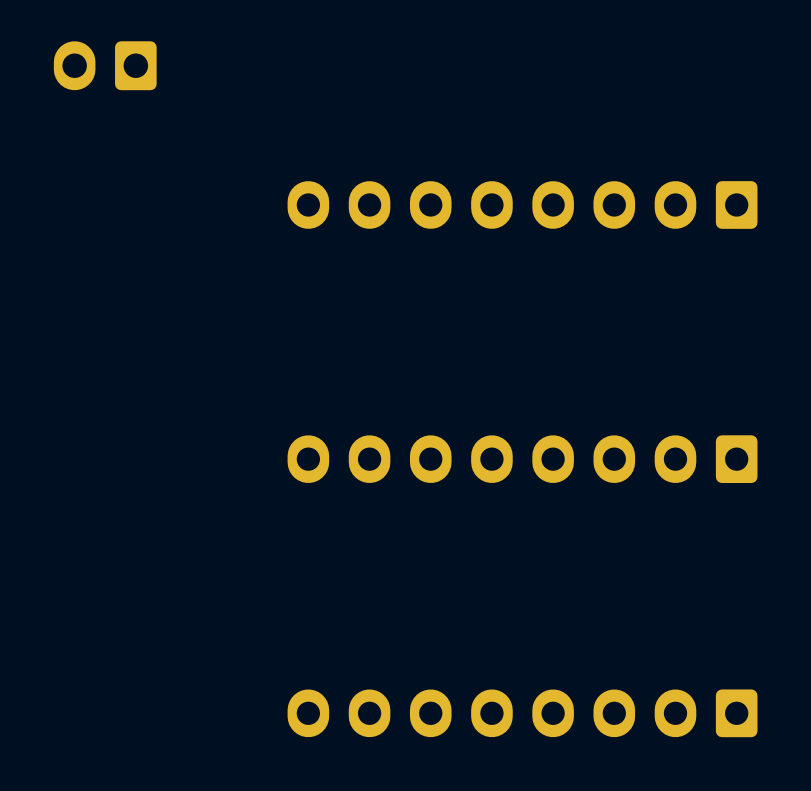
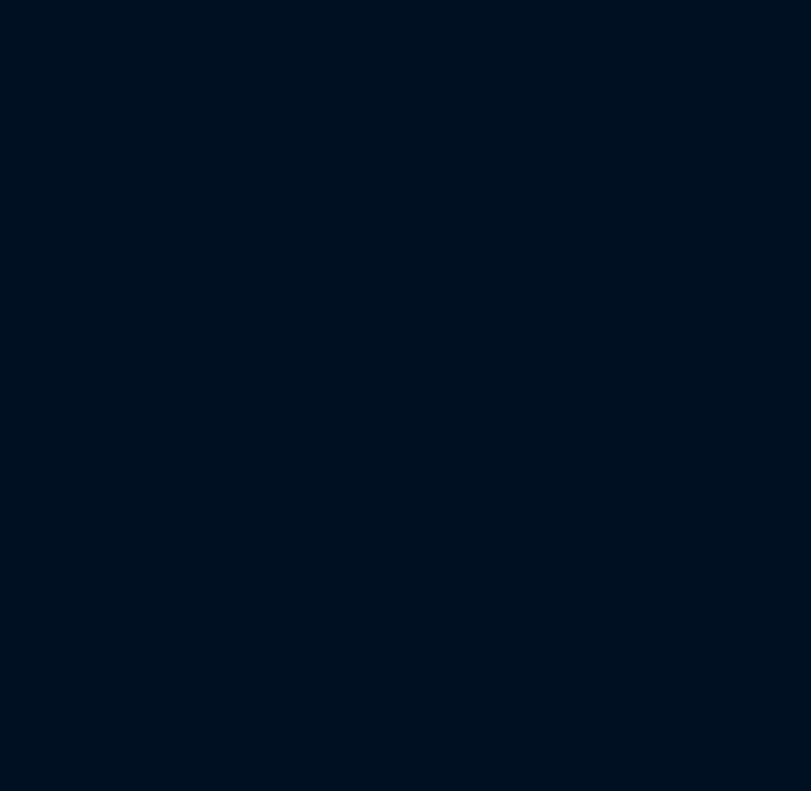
part: (105, 65) -> none
part: (522, 204) -> none
part: (522, 459) -> none
part: (522, 713) -> none

